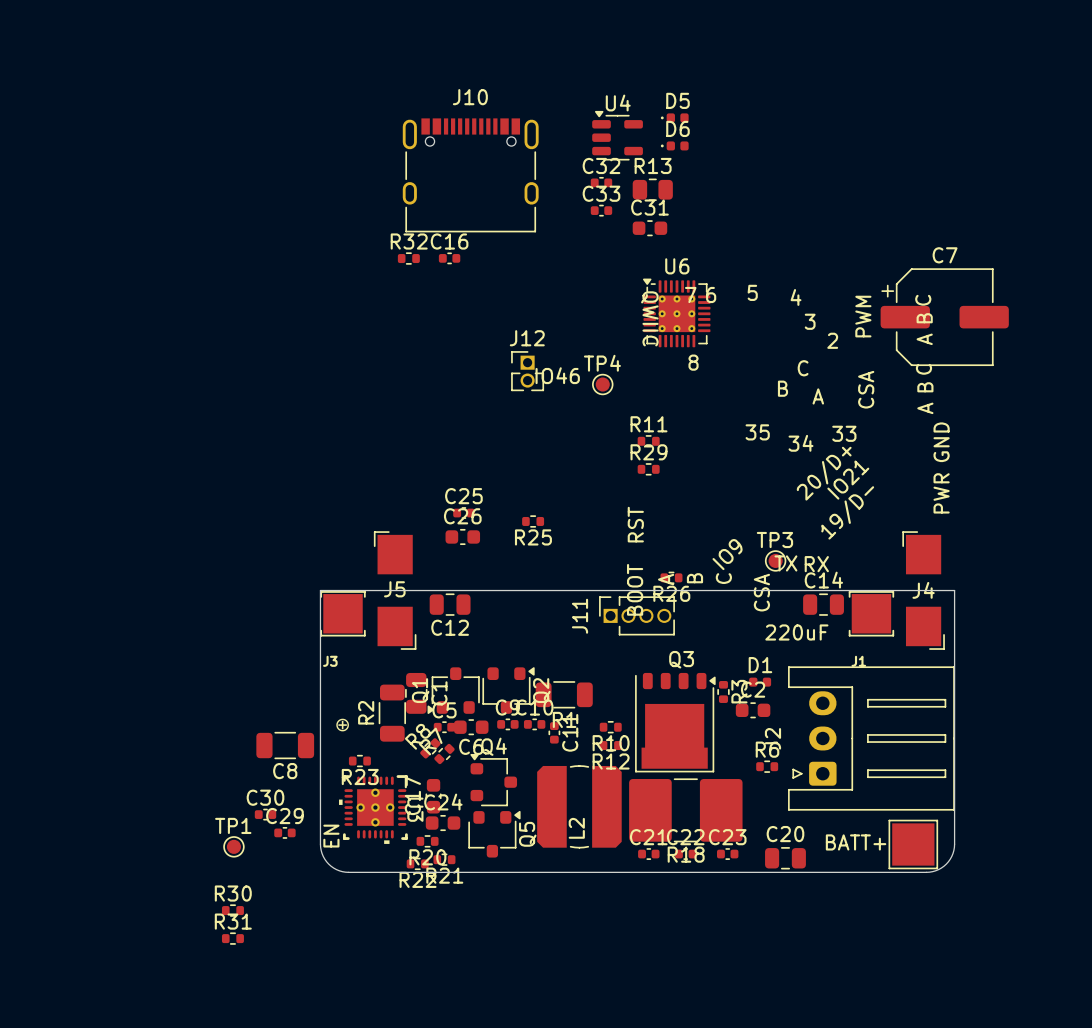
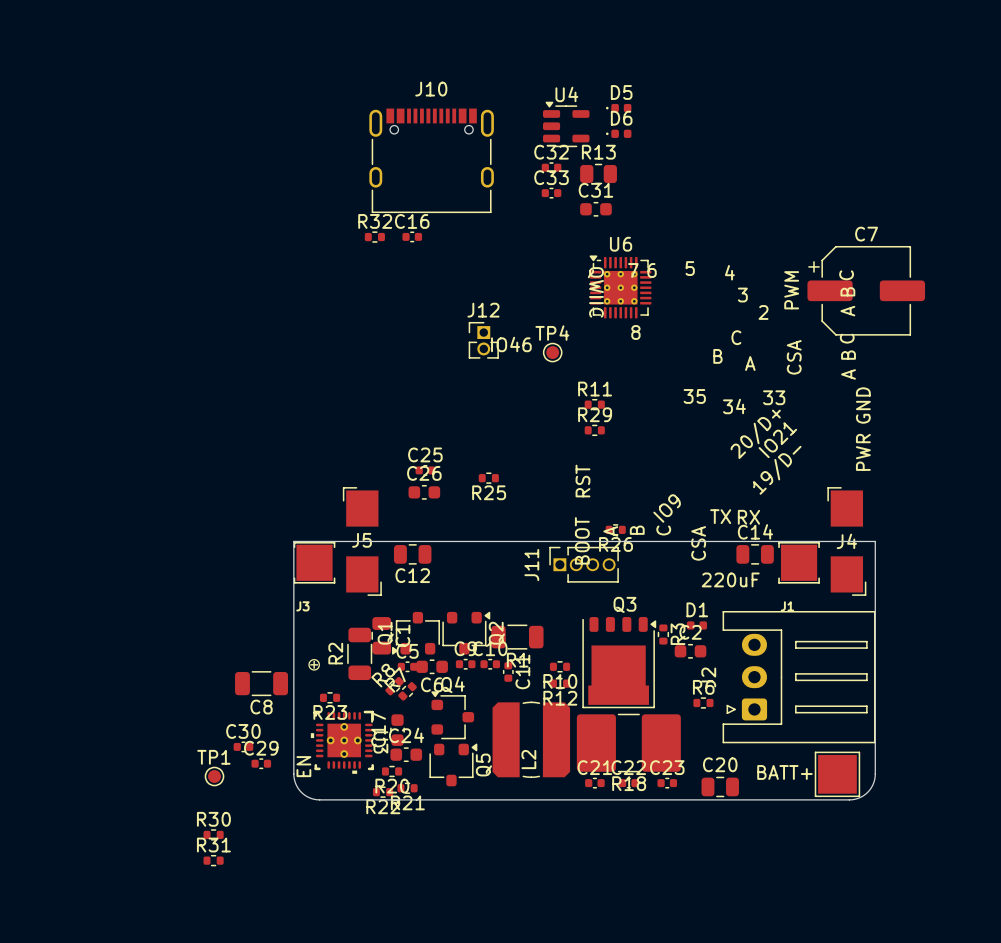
TP3: (775, 560) -> none

